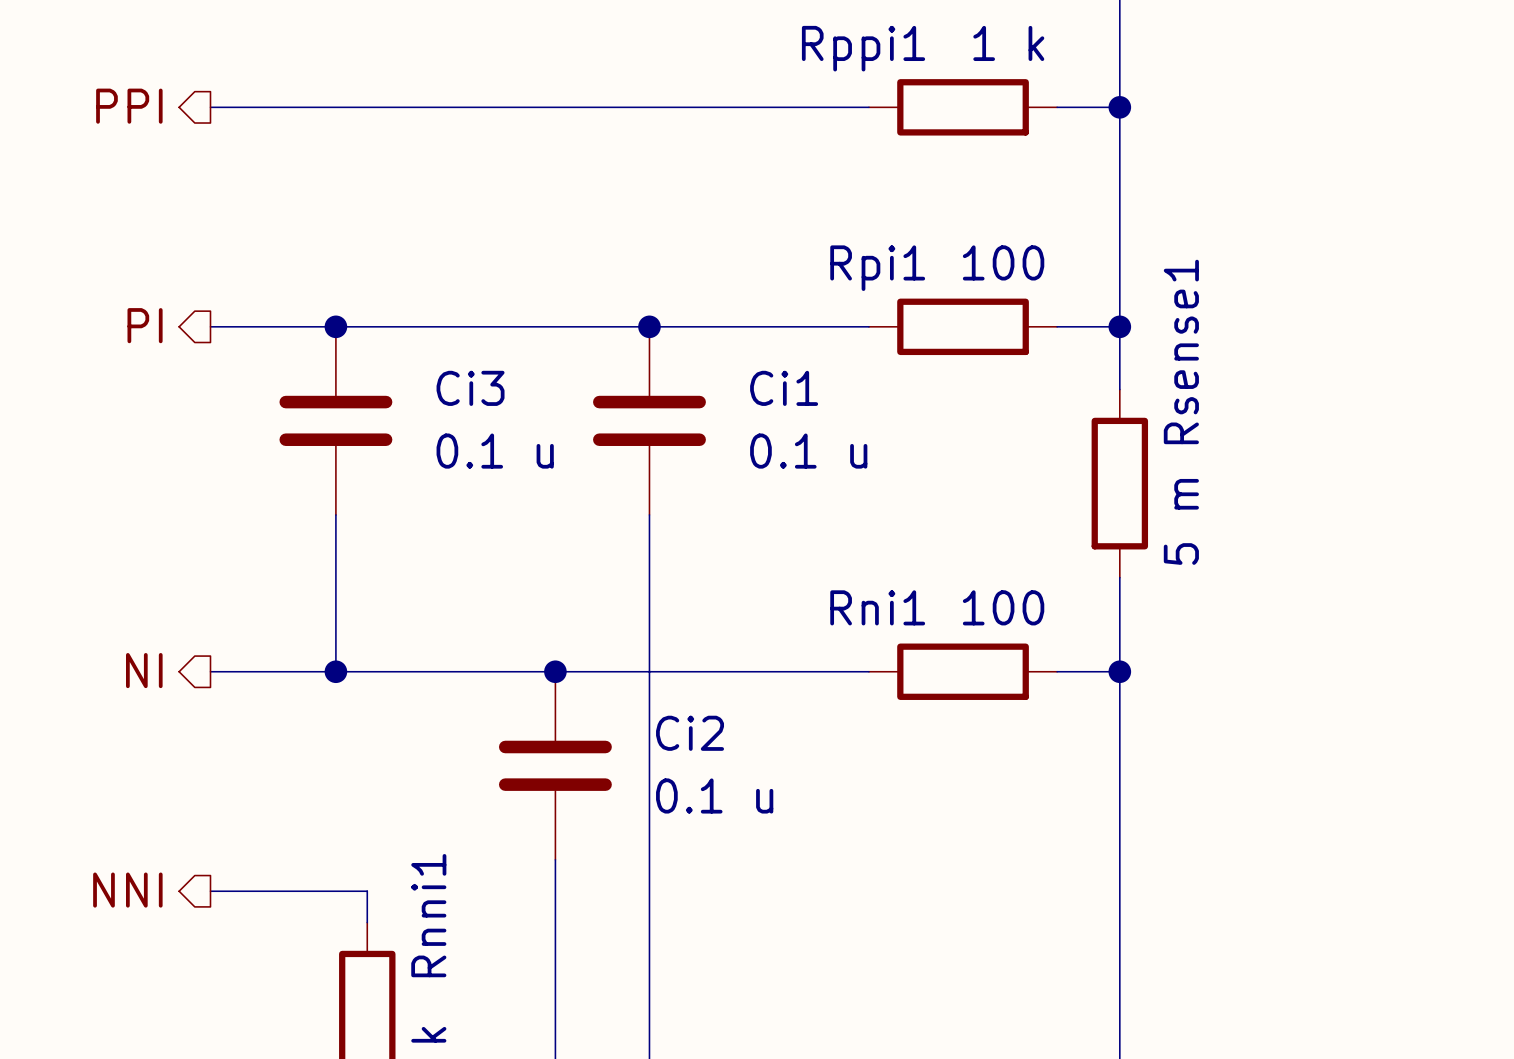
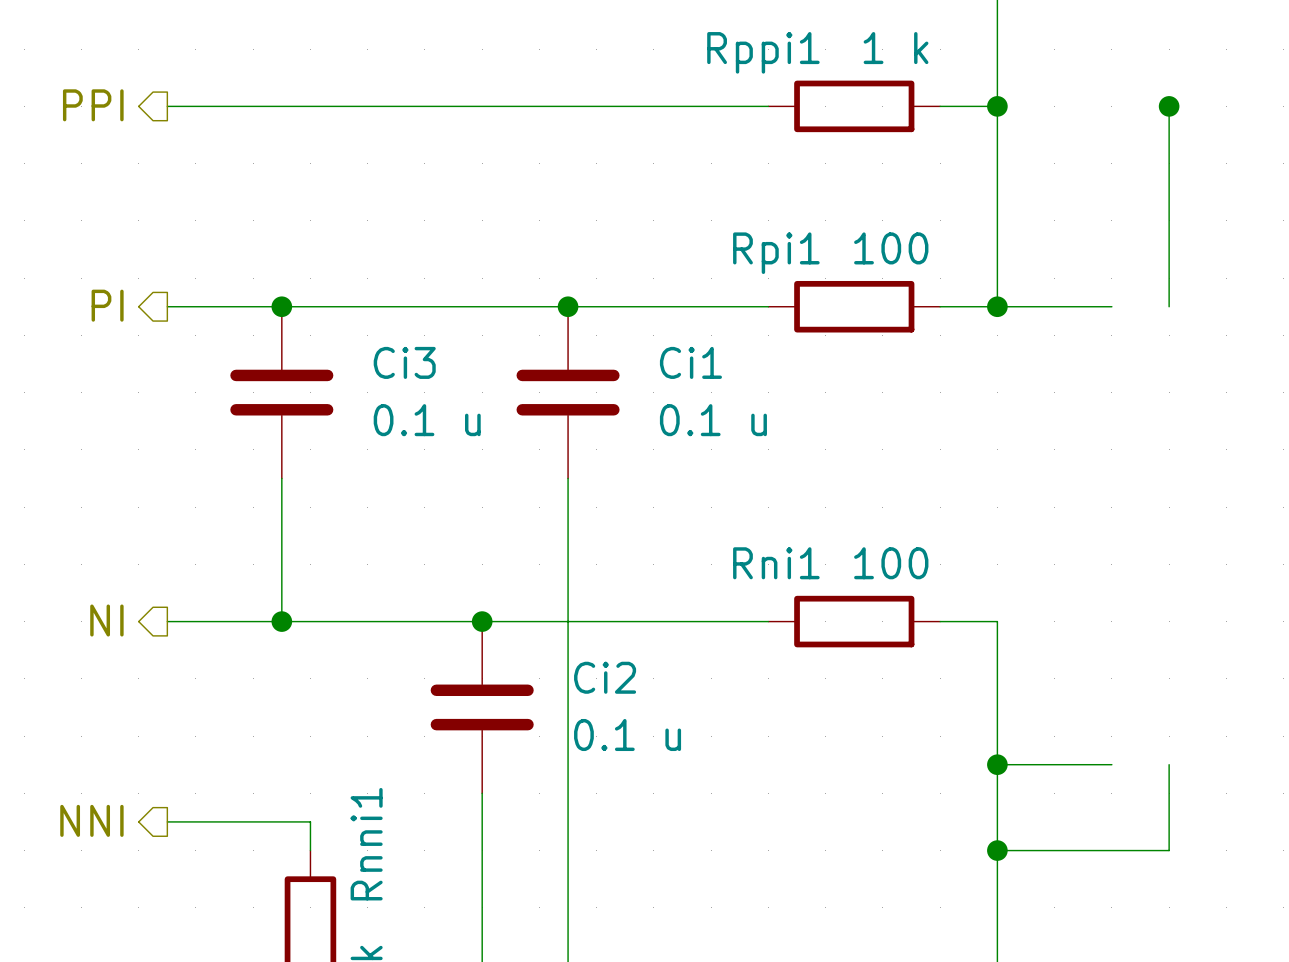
wire: none -> (1169, 106) (1169, 306)
junction: none -> (1169, 106)
wire: (1119, 326) (1119, 389) -> (997, 306) (1111, 306)
Rsense1: 5 m (1119, 483) -> none
wire: (1119, 577) (1119, 671) -> none
junction: (1119, 671) -> none
wire: none -> (997, 764) (1111, 764)
junction: none -> (997, 764)
wire: none -> (1169, 764) (1169, 850) (997, 850)
junction: none -> (997, 850)

